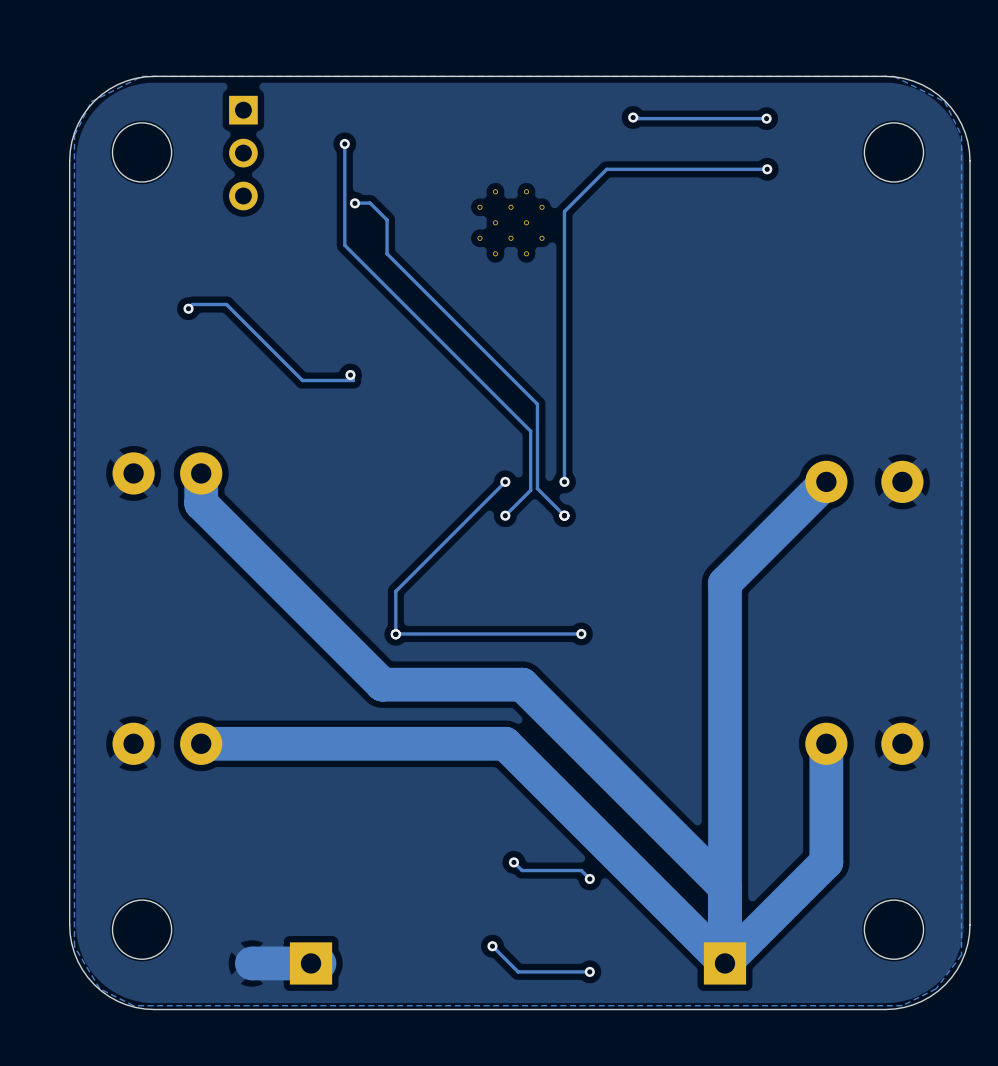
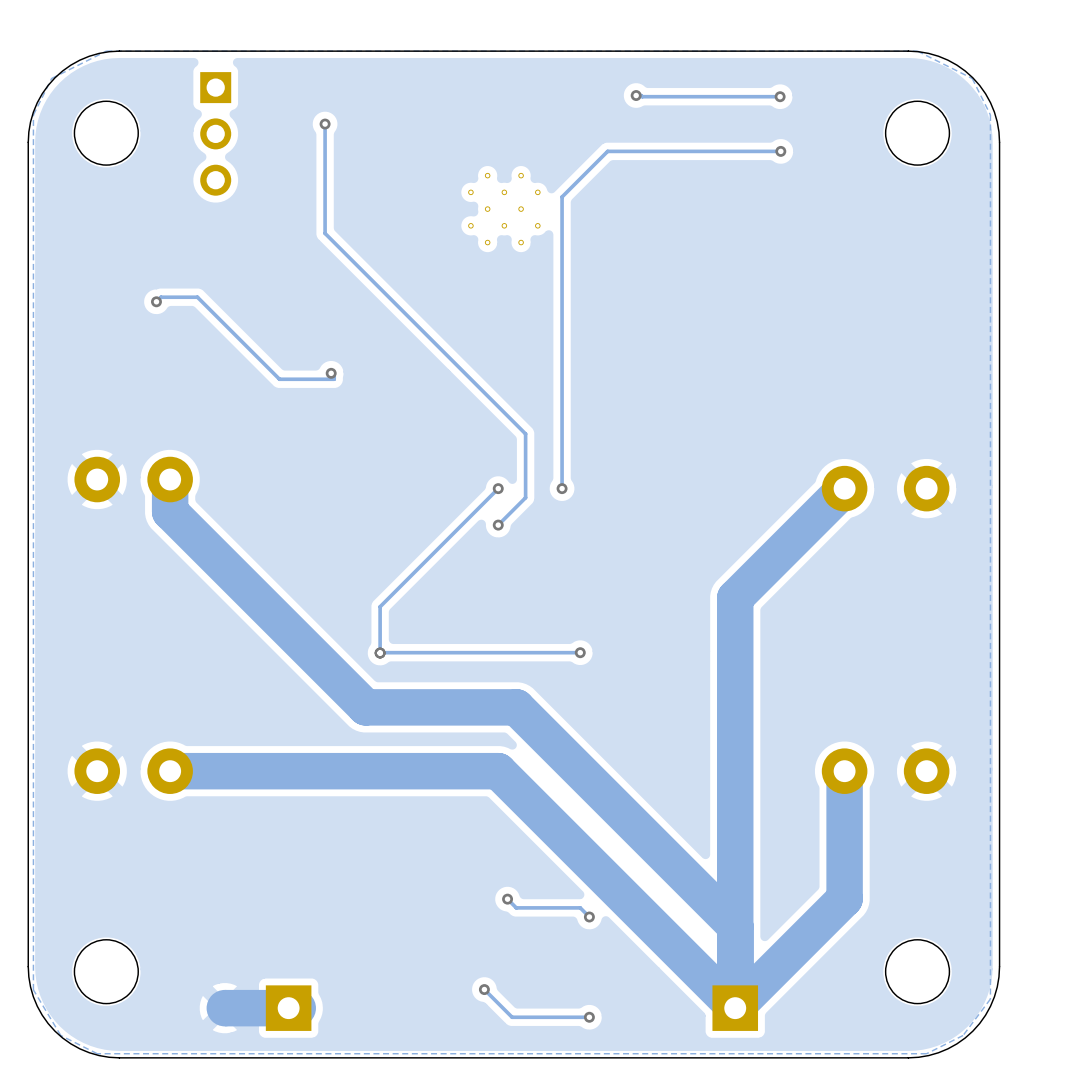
track: (354, 203) (370, 203) (387, 220) (387, 253) (537, 404) (537, 488) (564, 515) -> none
via: (354, 203) -> none
via: (564, 515) -> none

